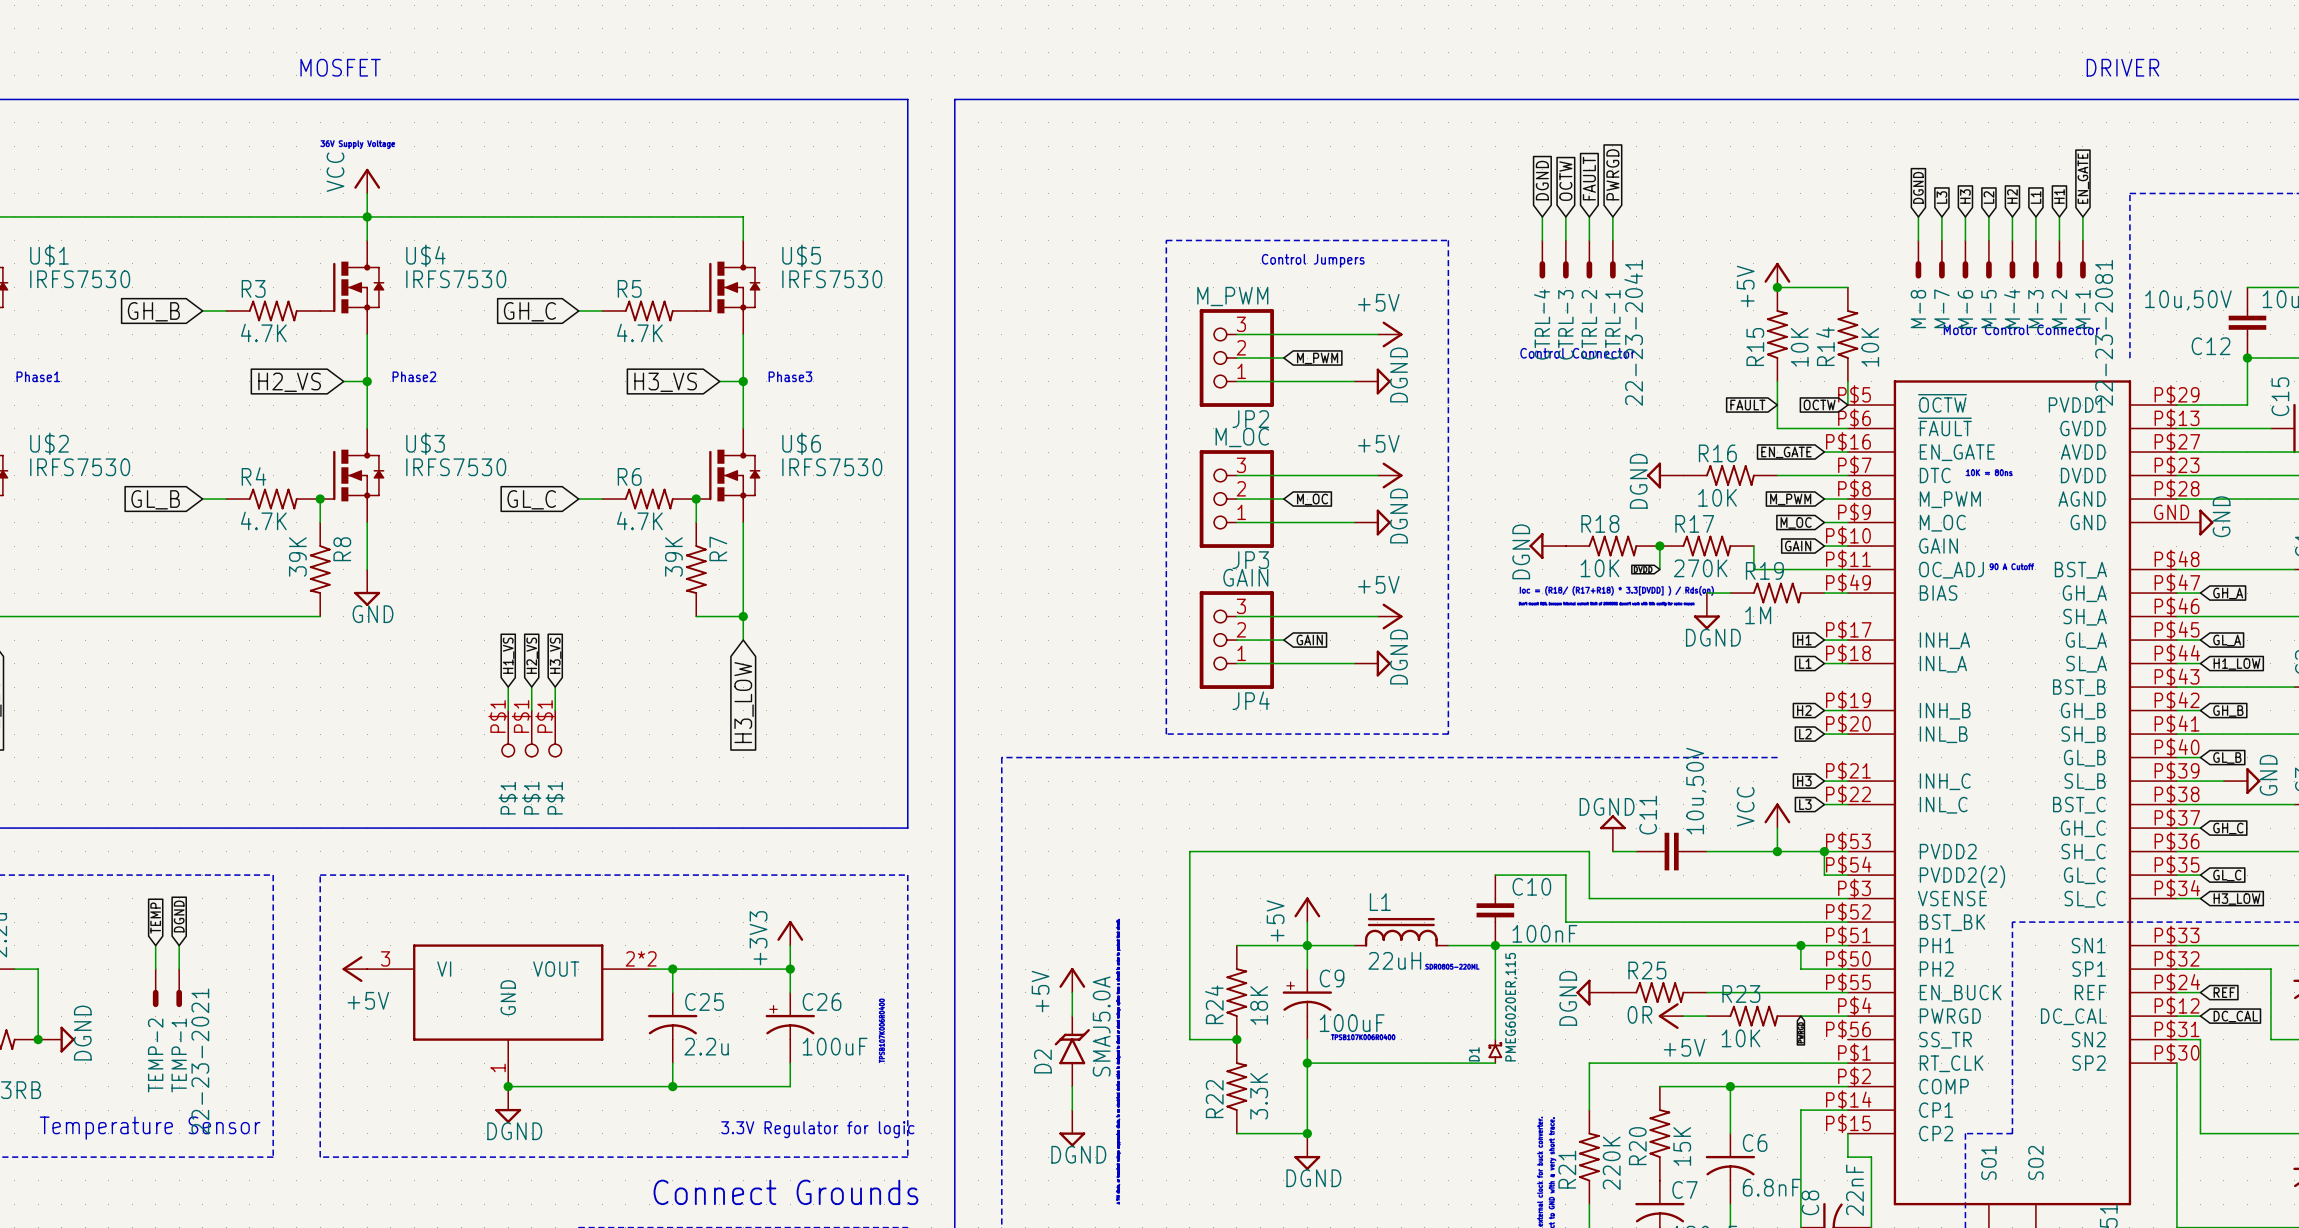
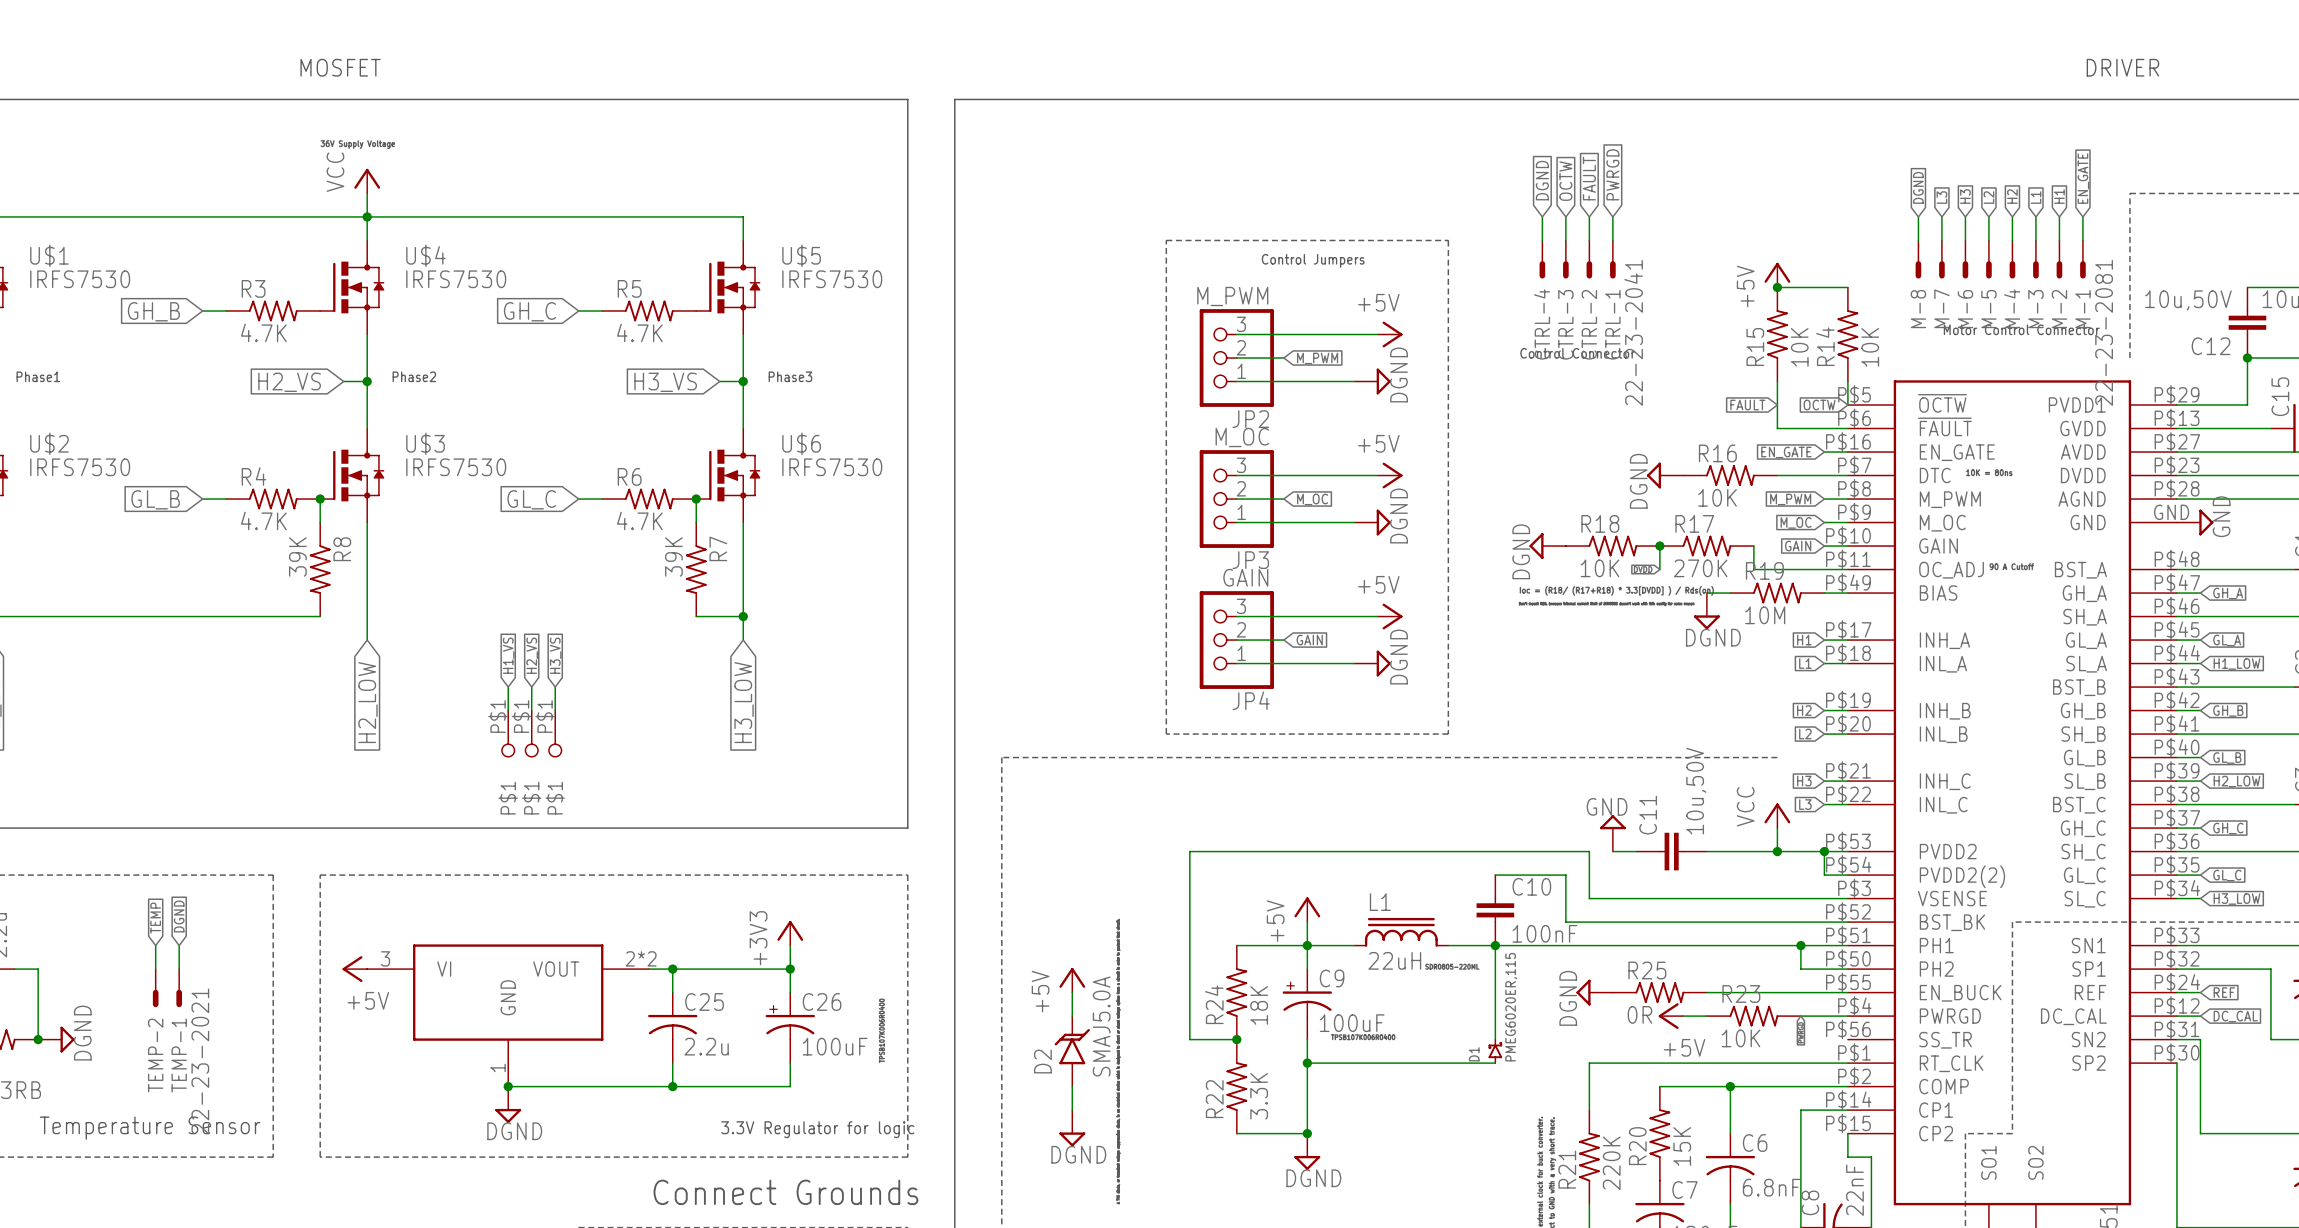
wire: none -> (367, 569) (367, 640)
power symbol: GND (367, 587) -> none
R19 value: 1M (1758, 615) -> 10M (1765, 615)
global label: none -> H2_LOW (367, 702)
wire: (2200, 781) (2223, 781) -> none
global label: none -> H2_LOW (2237, 781)
power symbol: GND (2242, 781) -> none
power symbol: DGND (1612, 833) -> GND (1612, 833)

